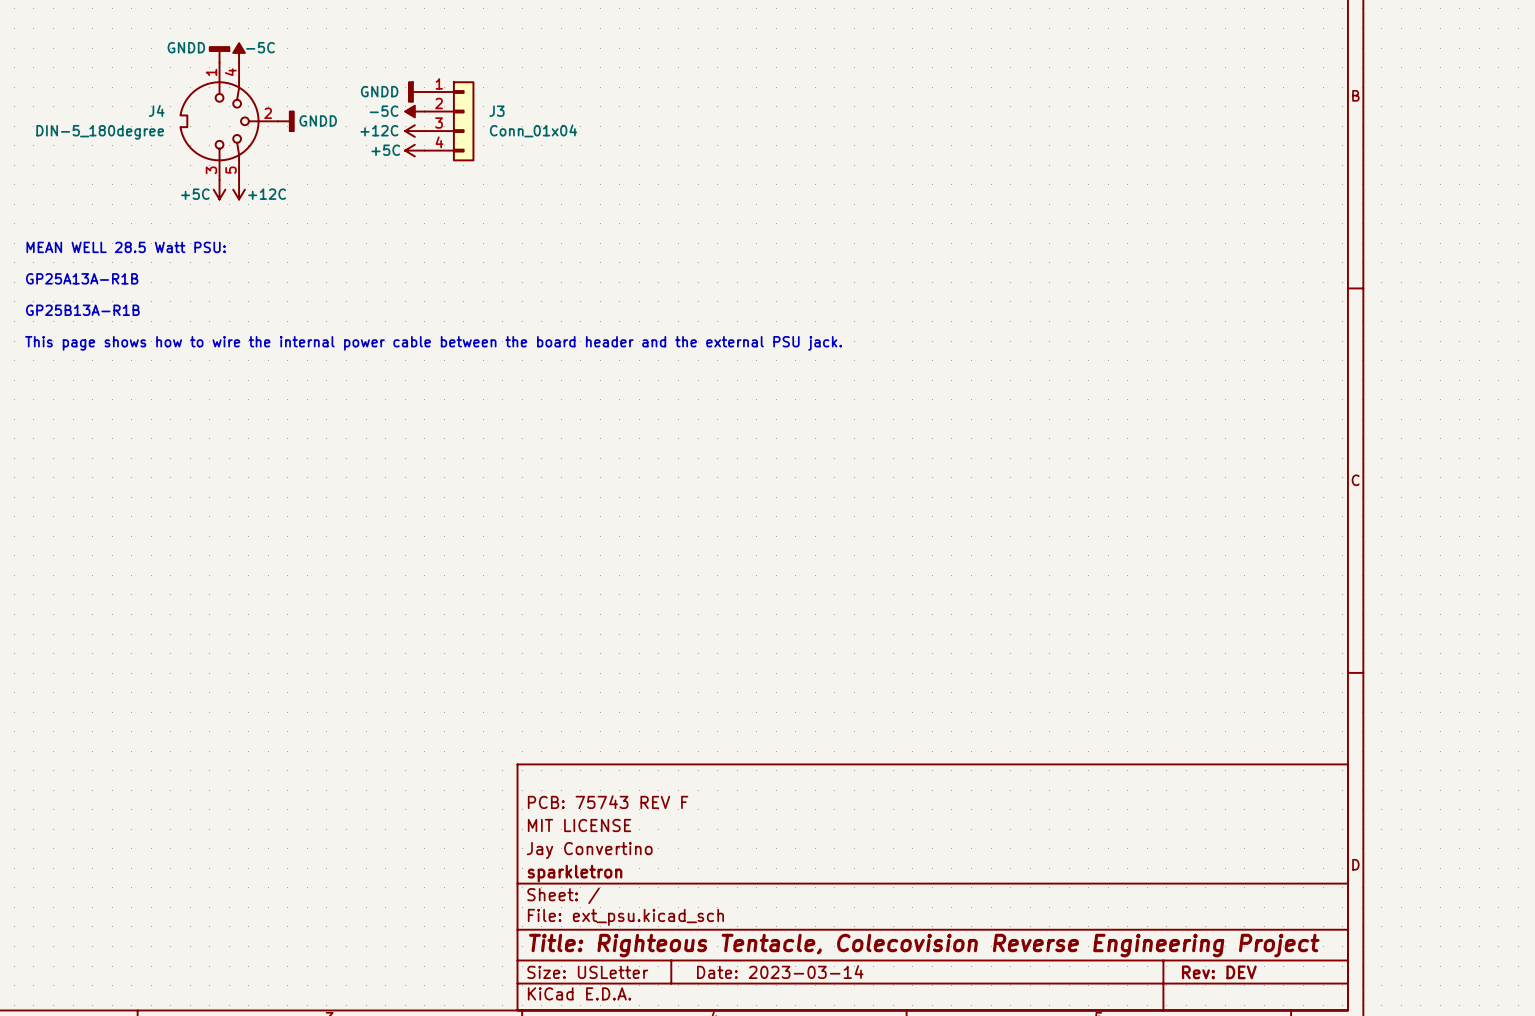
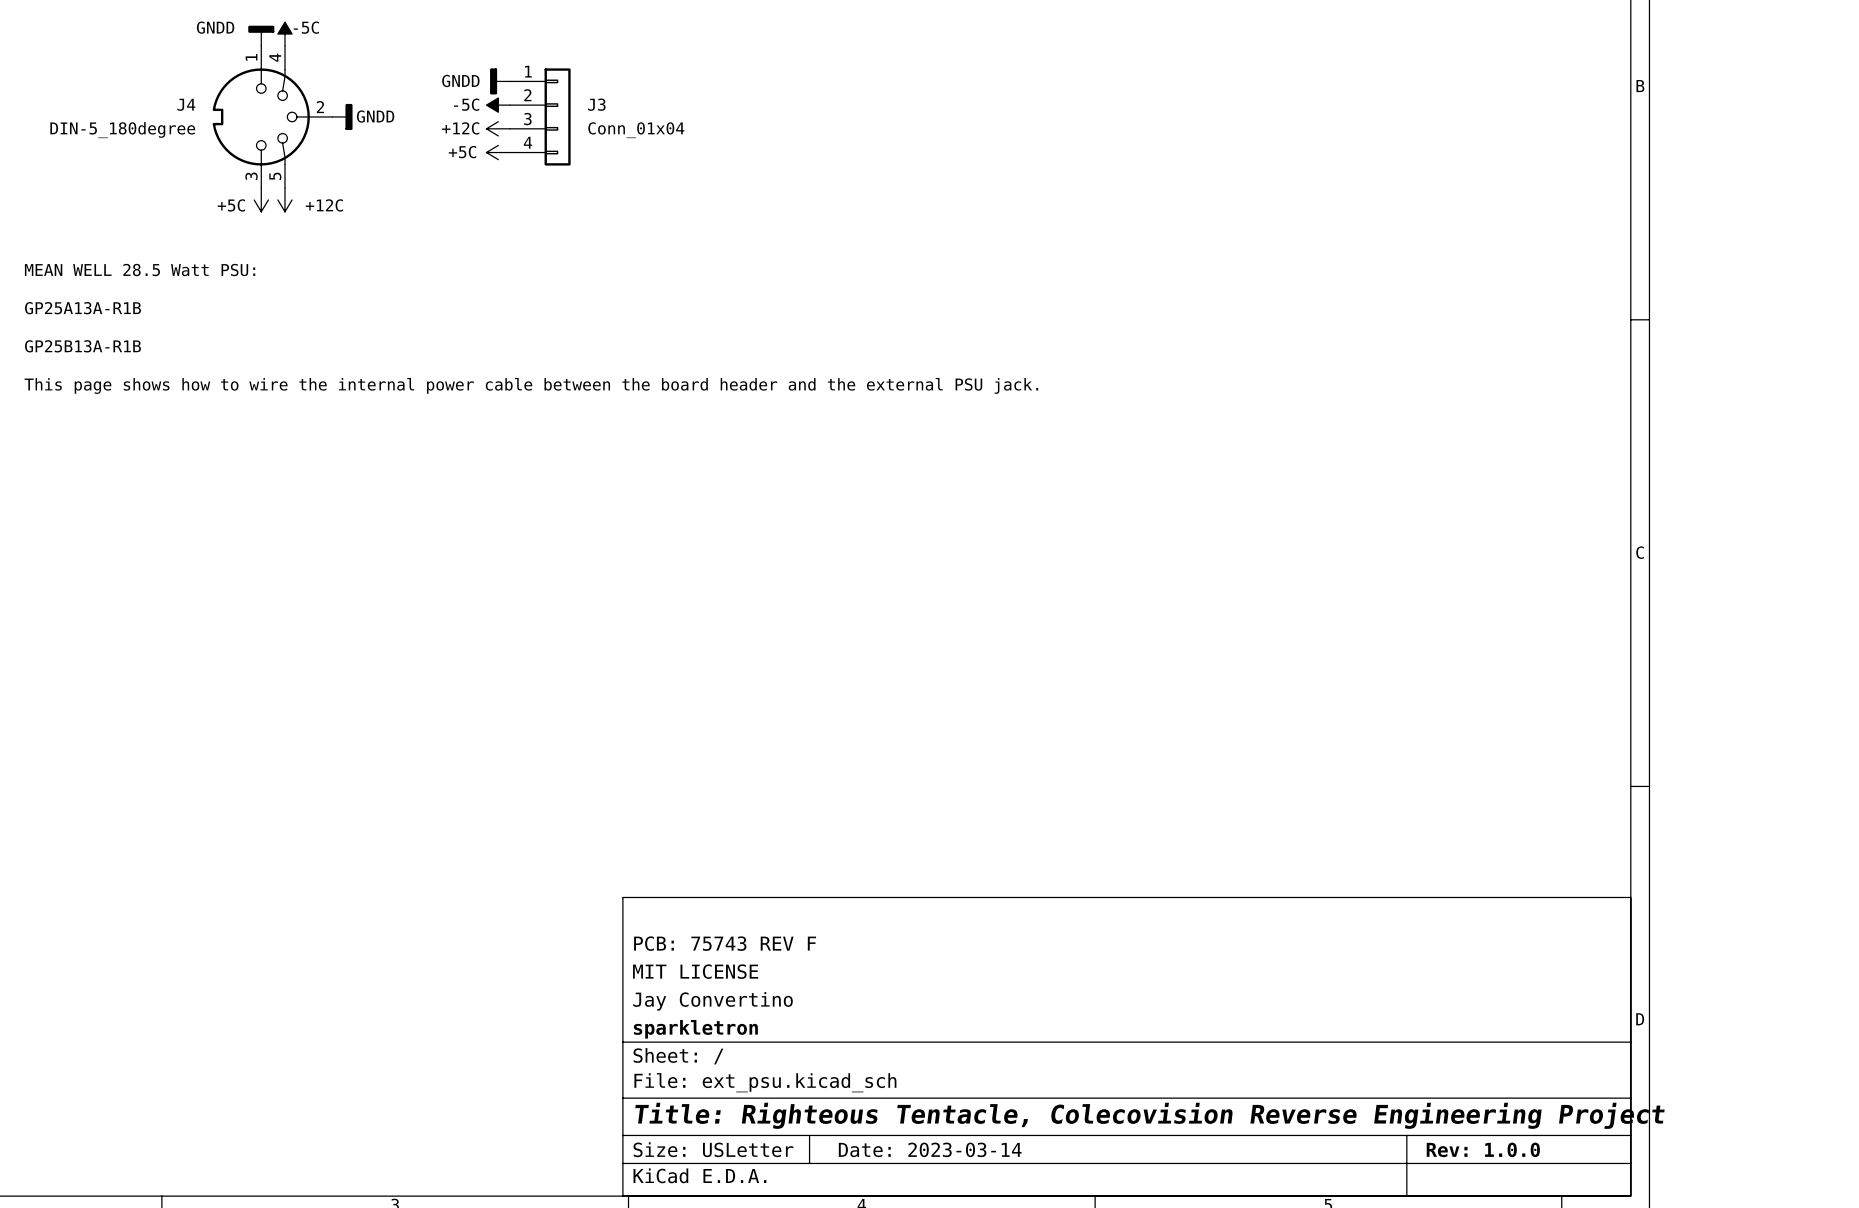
title block: Rev: DEV (1219, 972) -> Rev: 1.0.0 (1483, 1149)

